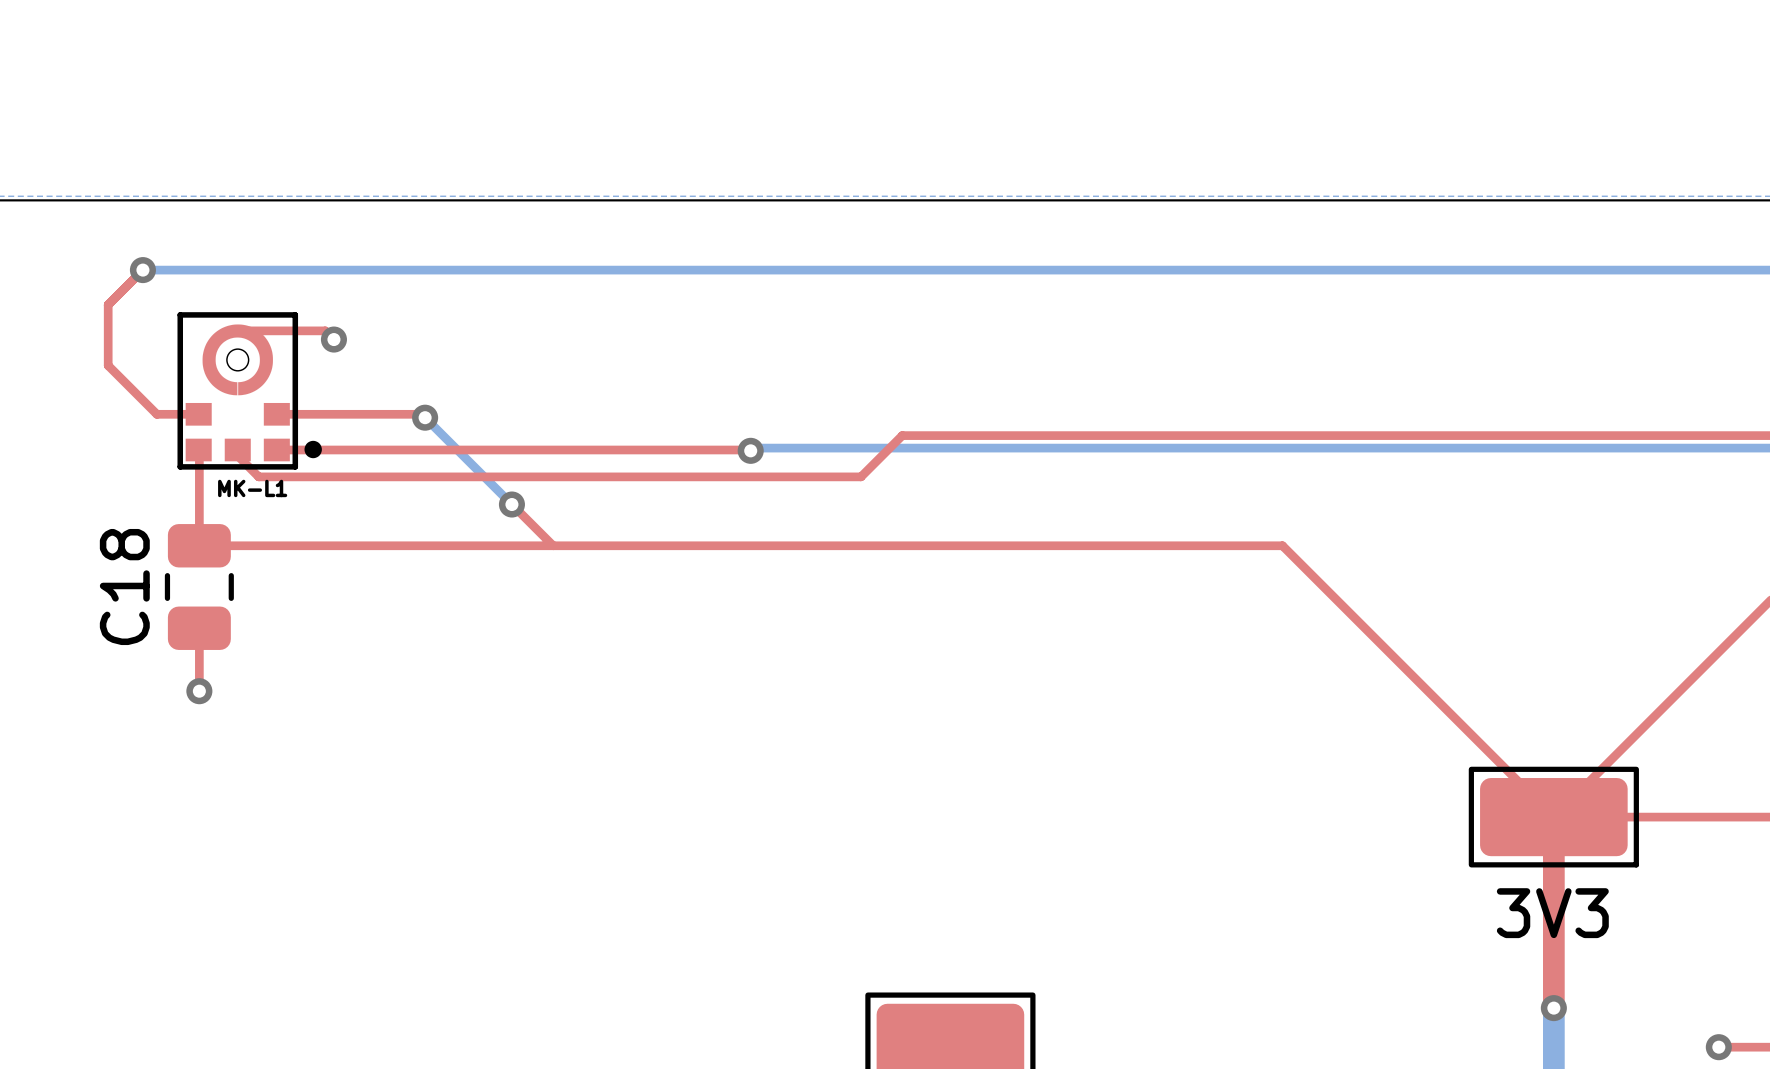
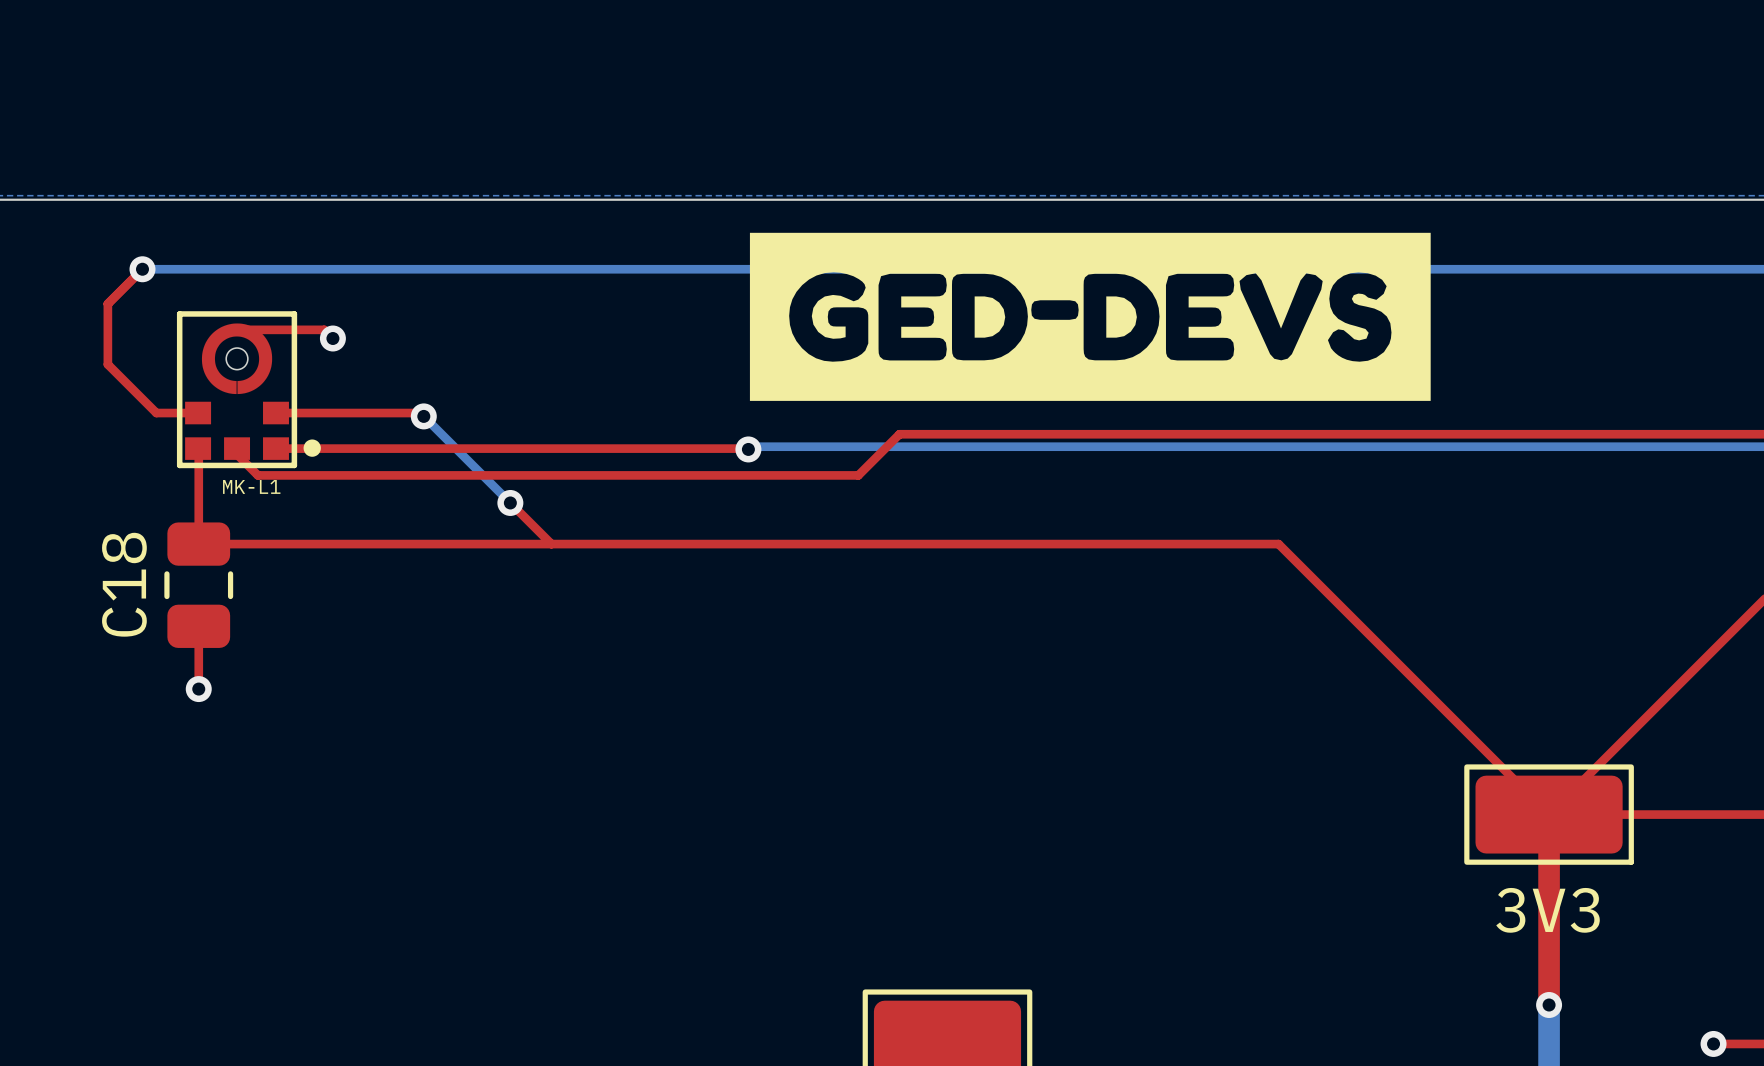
drawing: none -> [749, 232, 1431, 401]

